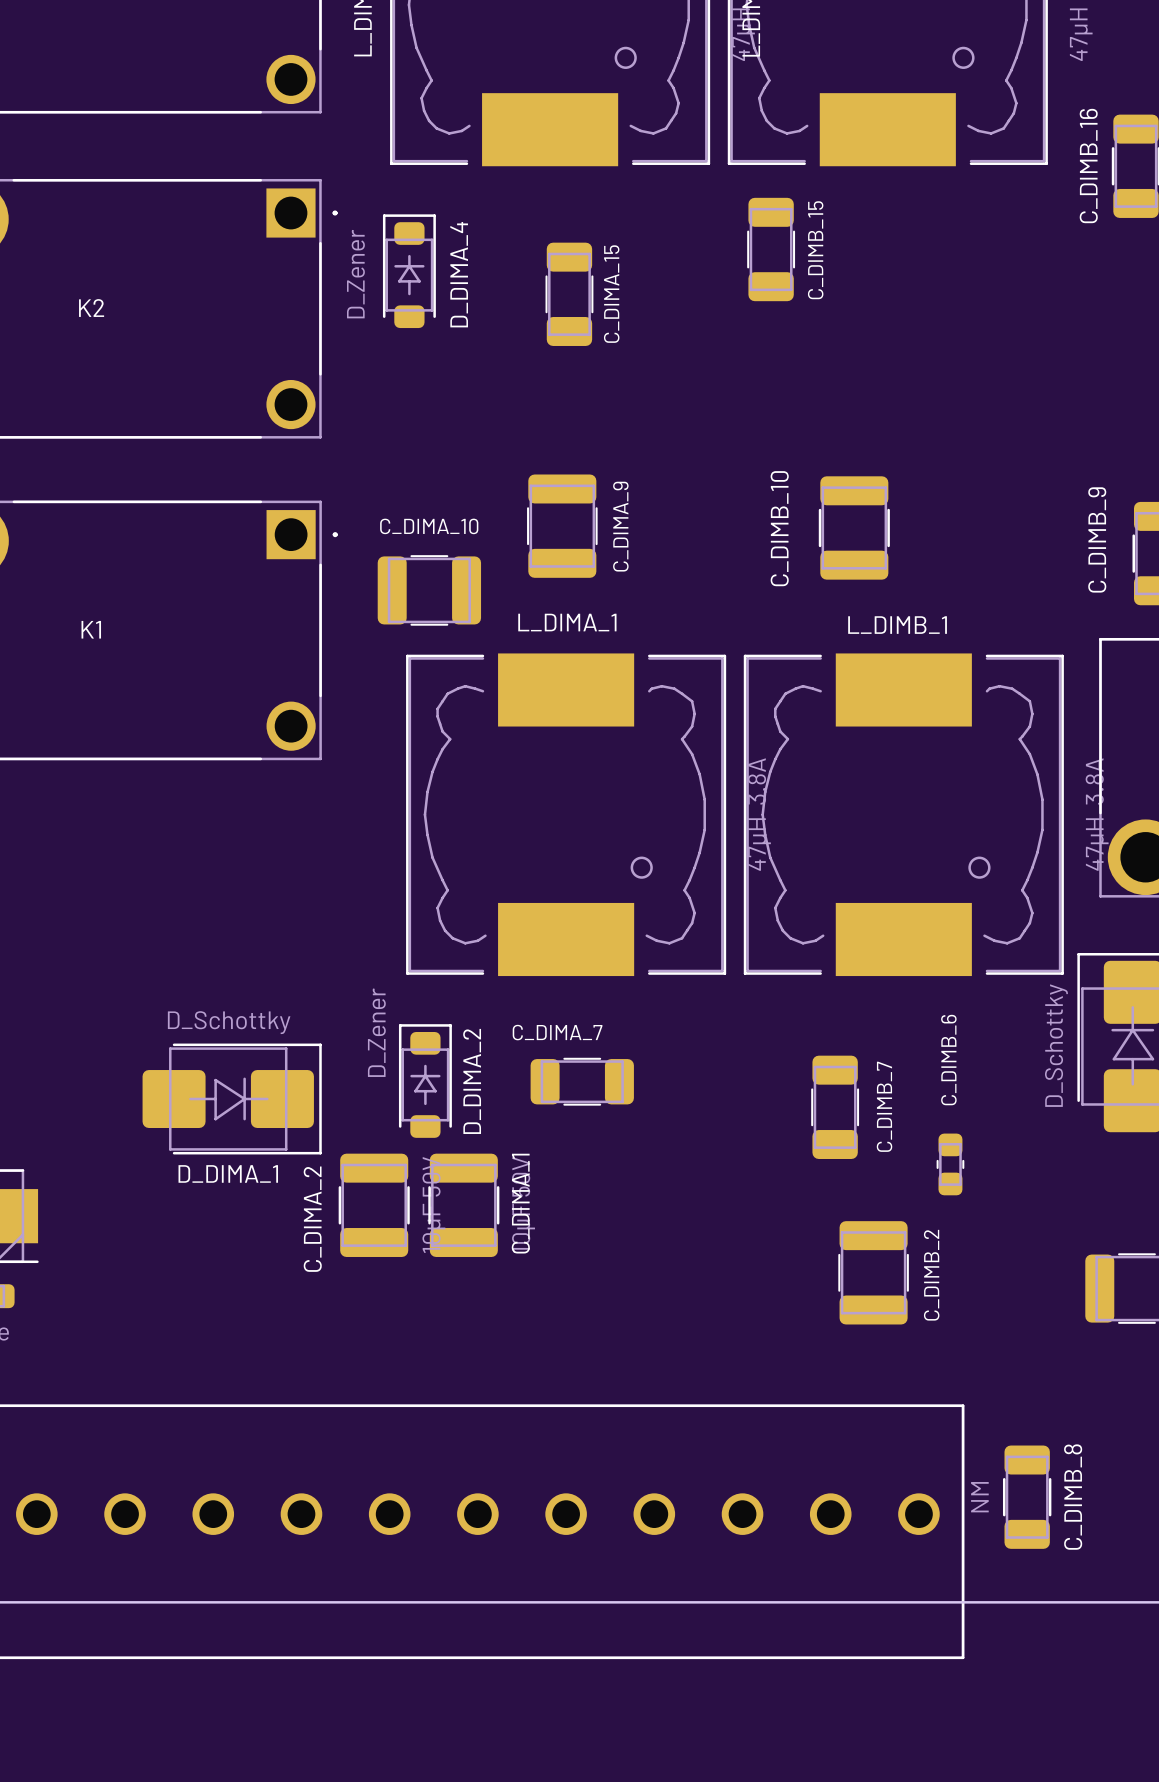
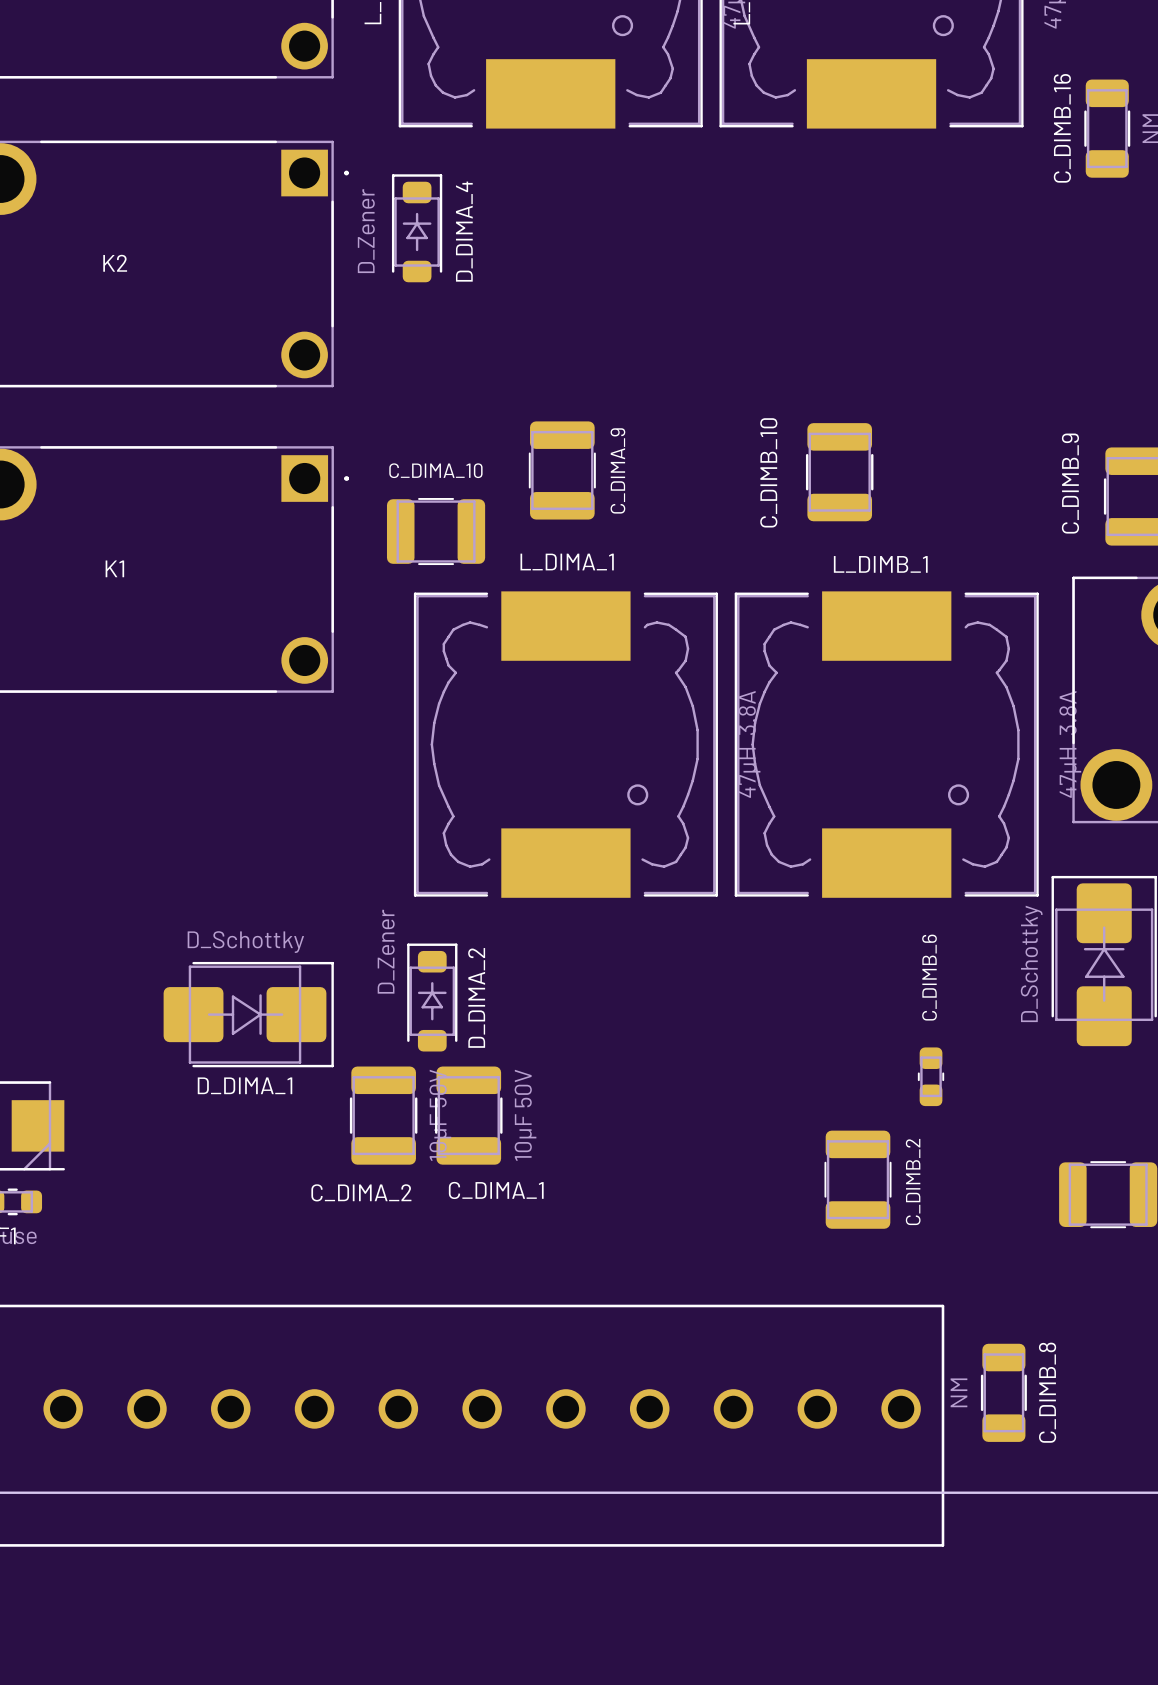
C_DIMB_15: (771, 249) -> none
C_DIMA_15: (569, 294) -> none
C_DIMA_7: (582, 1081) -> none
C_DIMB_7: (835, 1107) -> none
C_DIMA_1 name rotation: 0° (520, 1203) -> 90° clockwise (496, 1190)
C_DIMA_2 name rotation: 0° (312, 1219) -> 90° clockwise (361, 1192)

